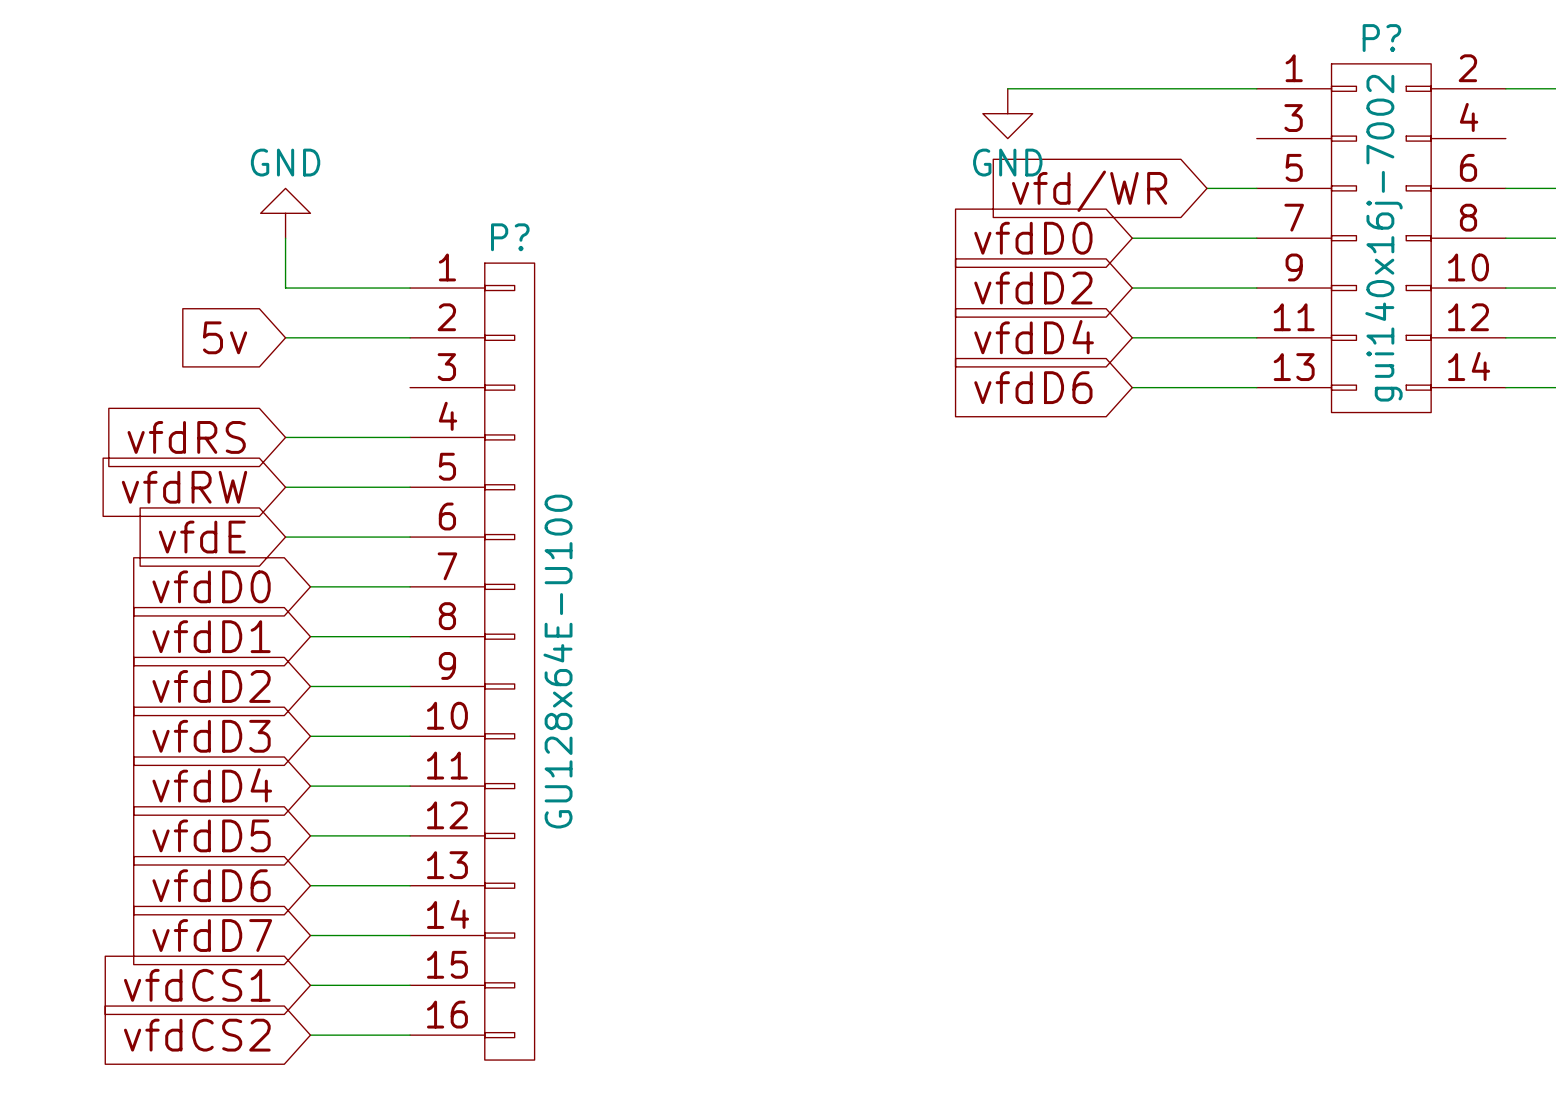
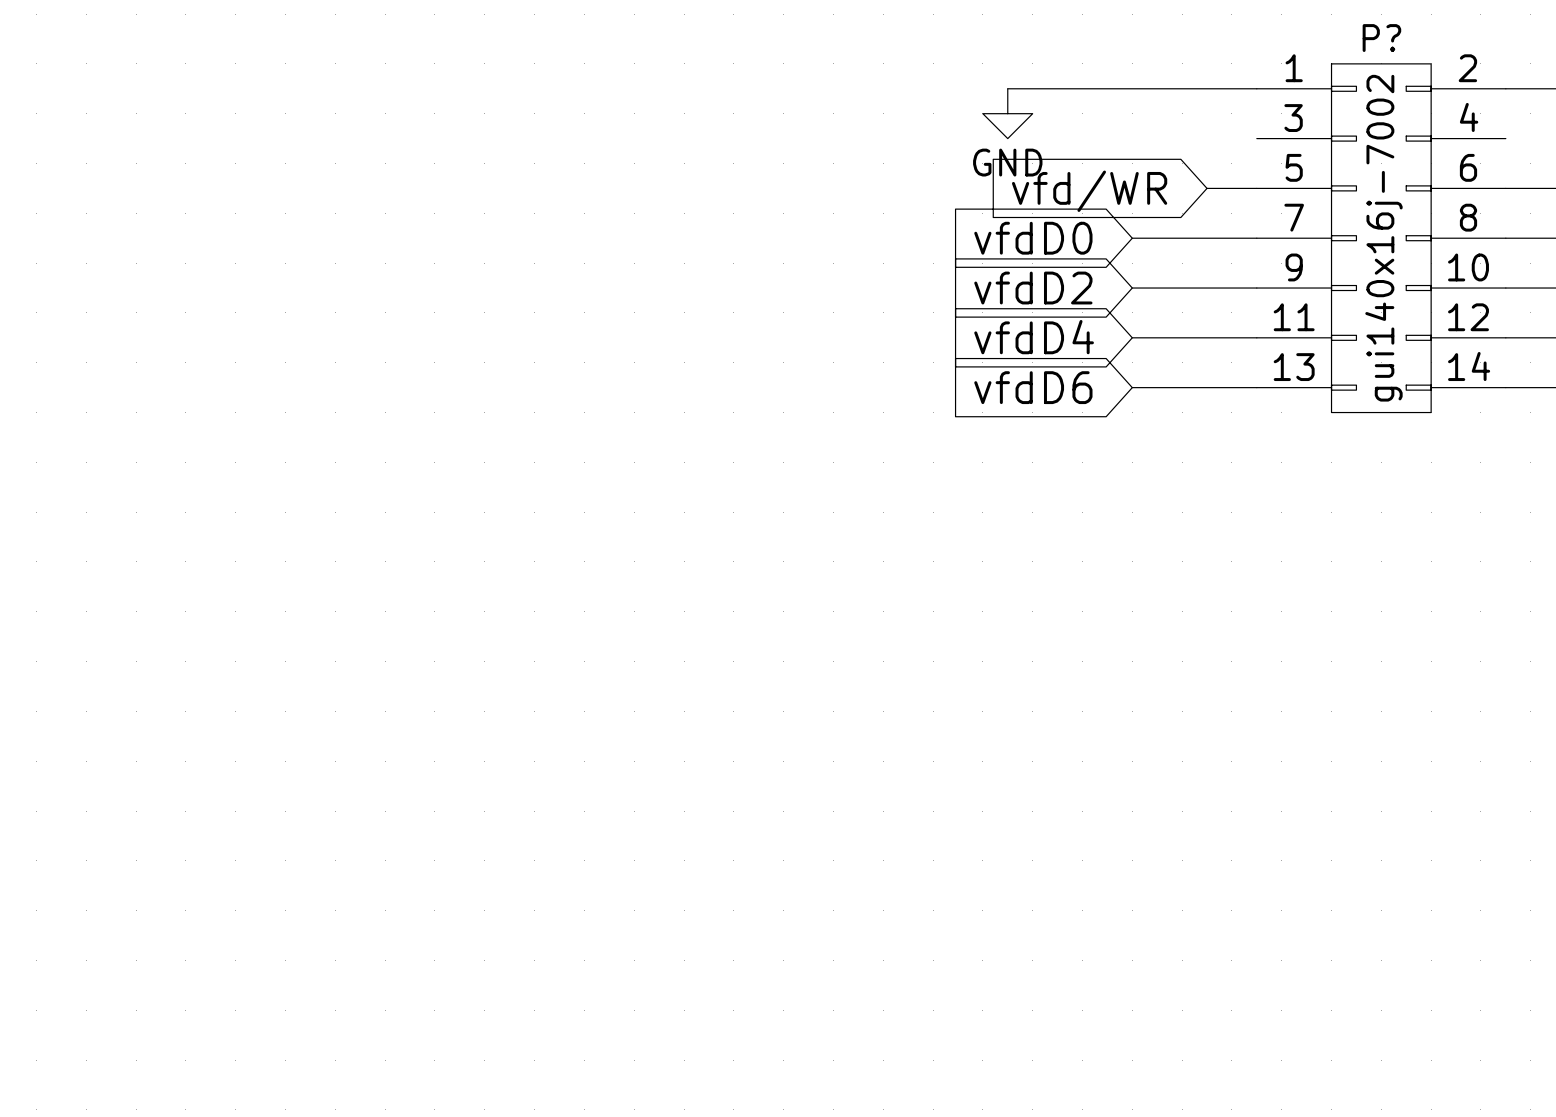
power symbol: GND (285, 213) -> none
wire: (285, 238) (285, 288) (410, 288) -> none
global label: 5v (225, 337) -> none
wire: (285, 337) (410, 337) -> none
global label: vfdRS (186, 437) -> none
wire: (285, 437) (410, 437) -> none
global label: vfdRW (184, 487) -> none
wire: (285, 487) (410, 487) -> none
global label: vfdE (202, 537) -> none
wire: (285, 537) (410, 537) -> none
global label: vfdD0 (211, 586) -> none
wire: (310, 586) (410, 586) -> none
global label: vfdD1 (211, 636) -> none
wire: (310, 636) (410, 636) -> none
P?: GU128x64E-U100 (472, 661) -> none
global label: vfdD2 (211, 686) -> none
wire: (310, 686) (410, 686) -> none
global label: vfdD3 (211, 736) -> none
wire: (310, 736) (410, 736) -> none
global label: vfdD4 (212, 785) -> none
wire: (310, 786) (410, 786) -> none
global label: vfdD5 (211, 835) -> none
wire: (310, 835) (410, 835) -> none
global label: vfdD6 (211, 885) -> none
wire: (310, 885) (410, 885) -> none
global label: vfdD7 (212, 935) -> none
wire: (310, 935) (410, 935) -> none
global label: vfdCS1 (197, 985) -> none
wire: (310, 985) (410, 985) -> none
global label: vfdCS2 (197, 1035) -> none
wire: (310, 1035) (410, 1035) -> none

